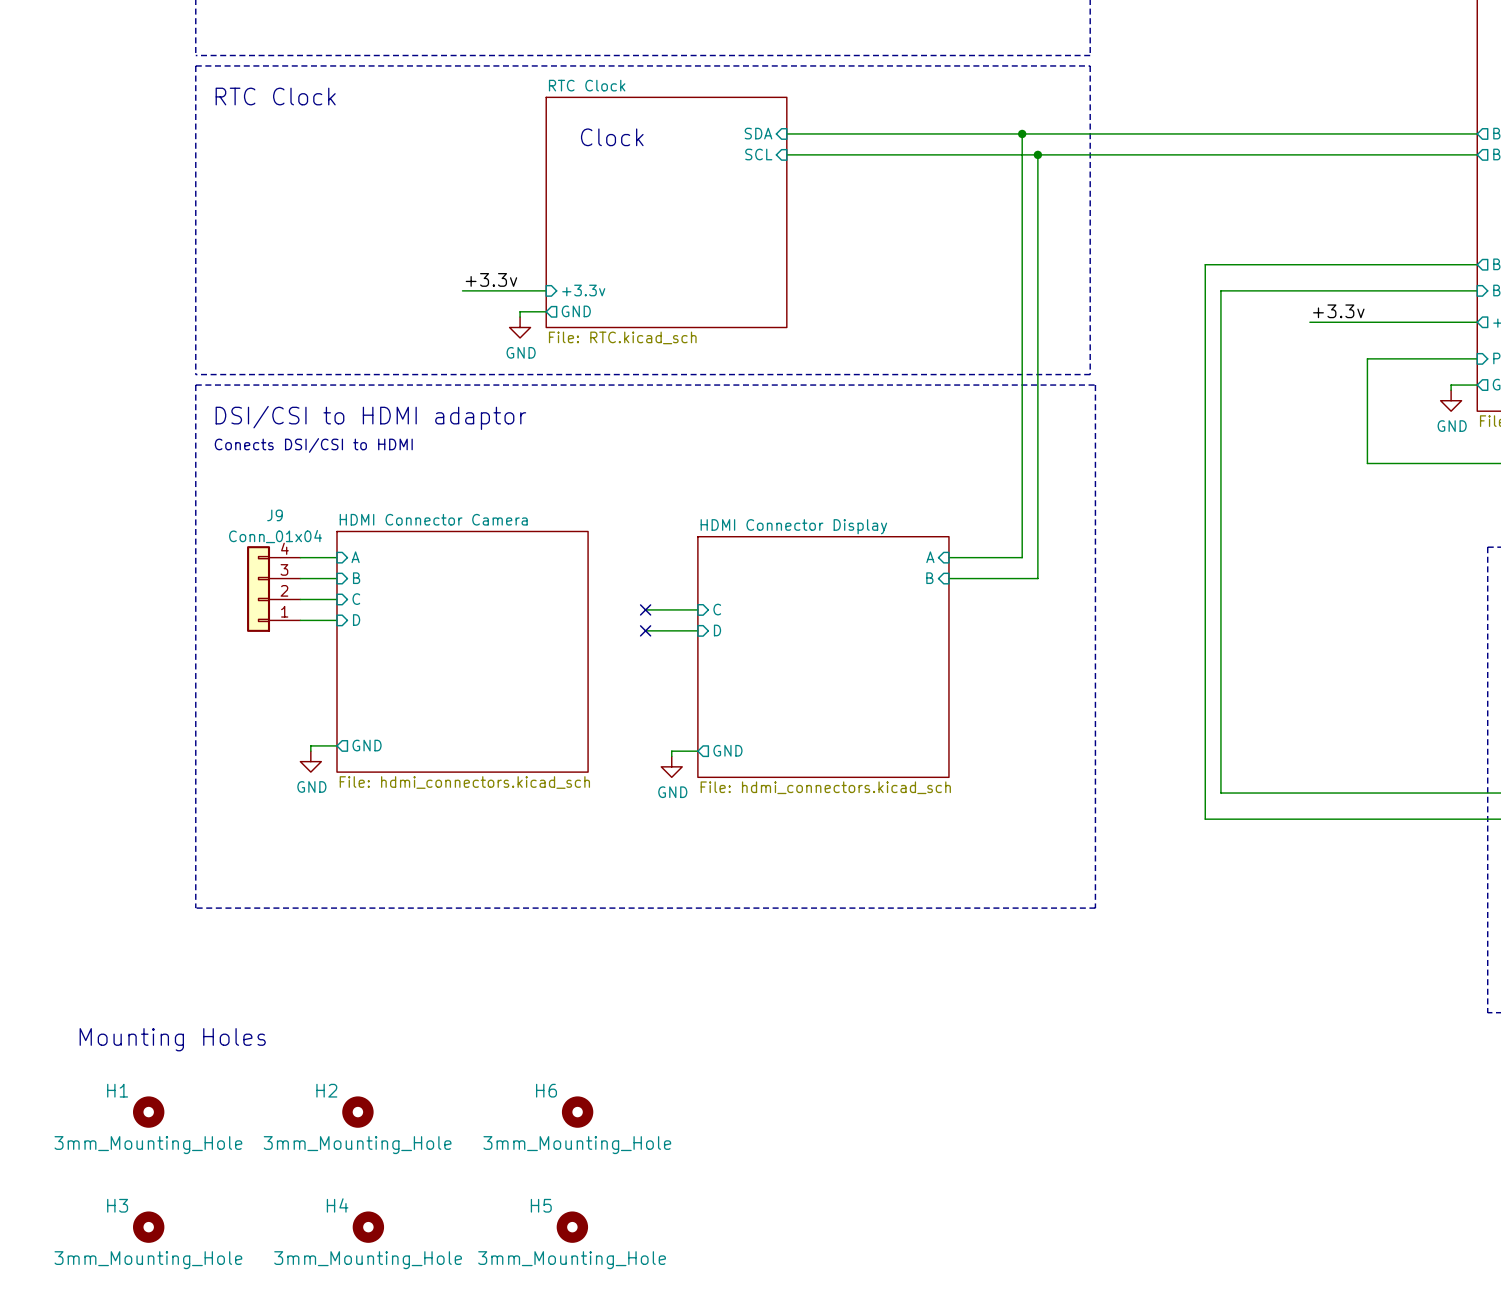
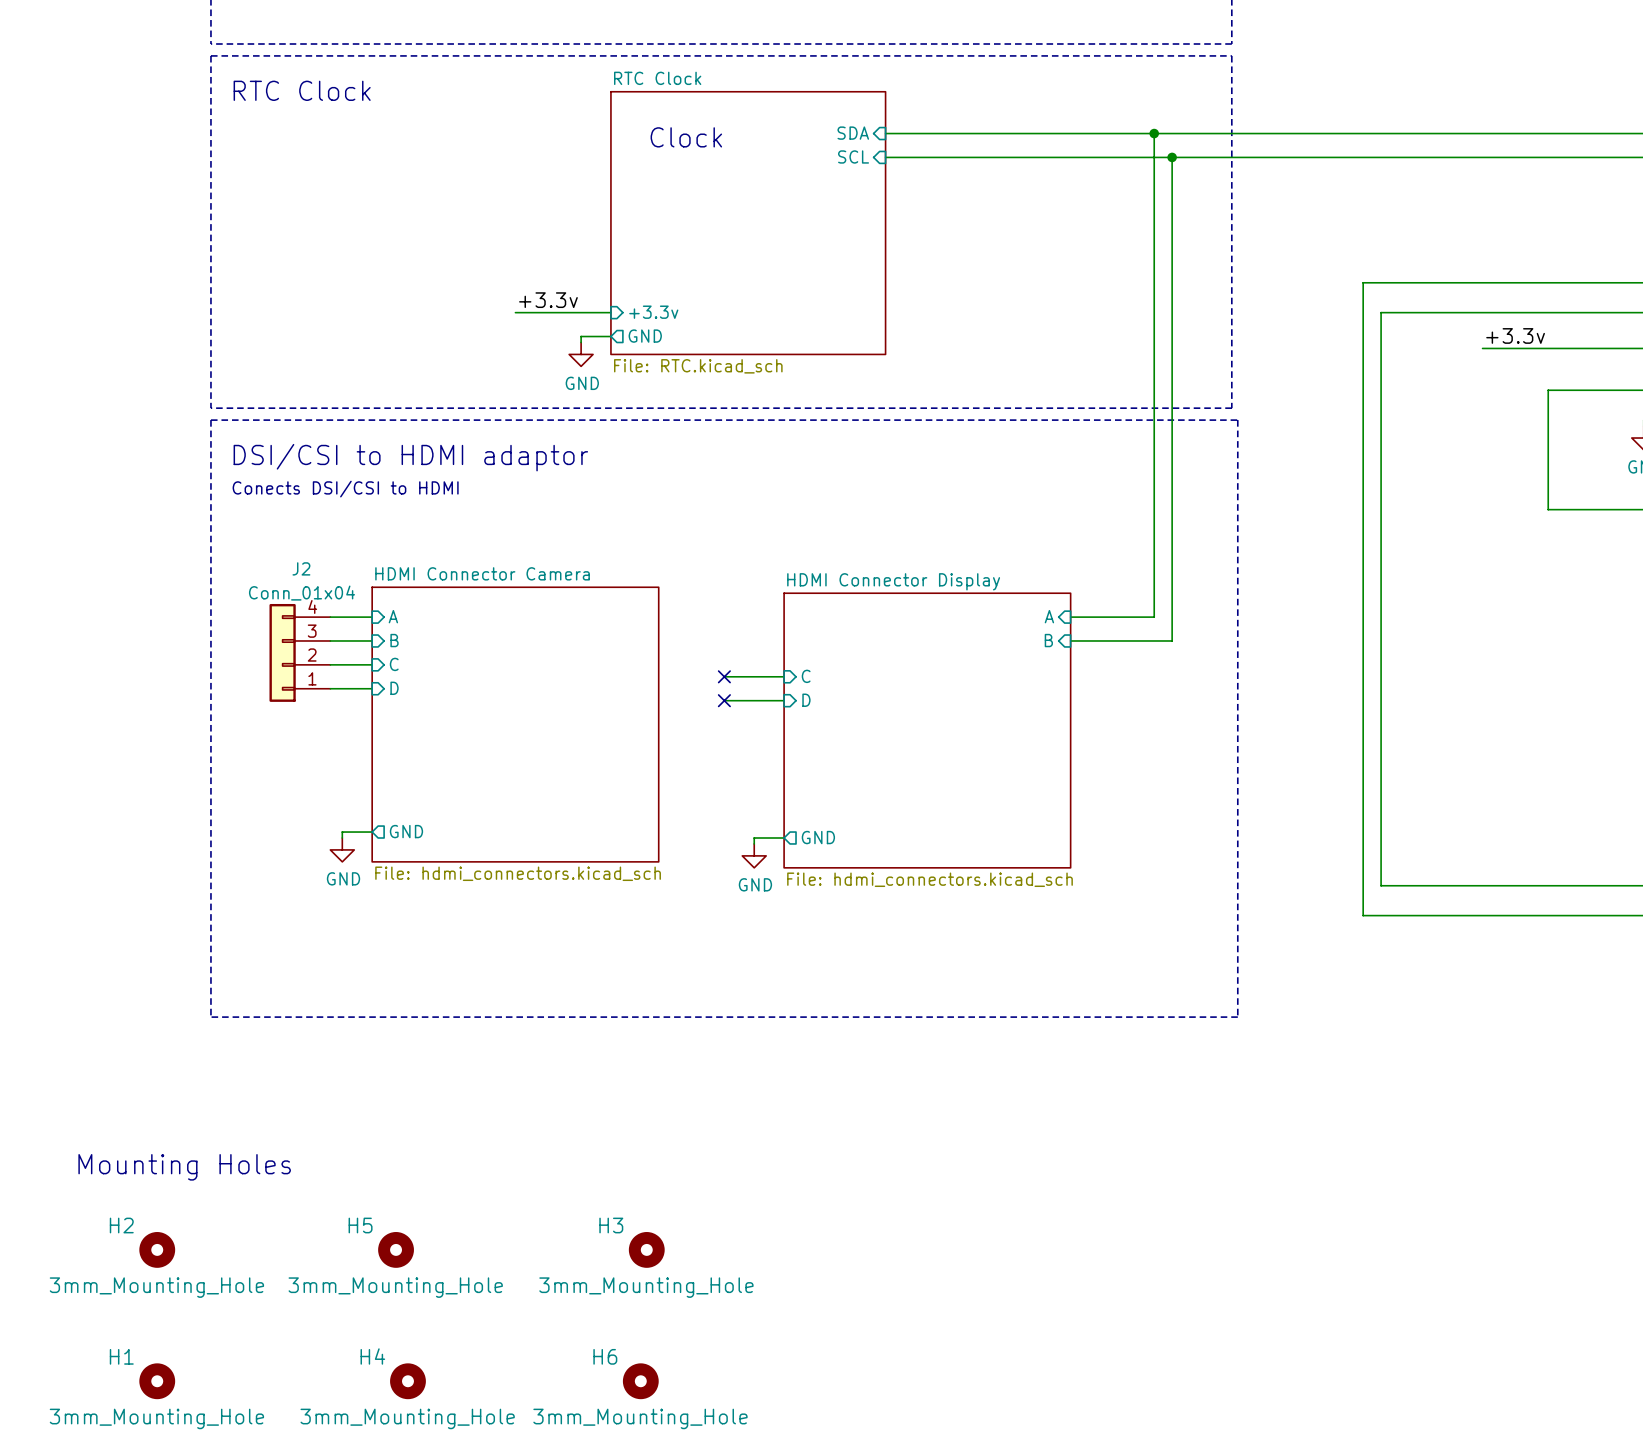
J9 name: J9 (275, 515) -> J2 (301, 568)
H1 name: H1 (117, 1090) -> H2 (121, 1225)
H2 name: H2 (326, 1090) -> H5 (360, 1225)
H6 name: H6 (546, 1090) -> H3 (611, 1225)
H3 name: H3 (117, 1205) -> H1 (121, 1356)
H5 name: H5 (541, 1205) -> H6 (605, 1356)

